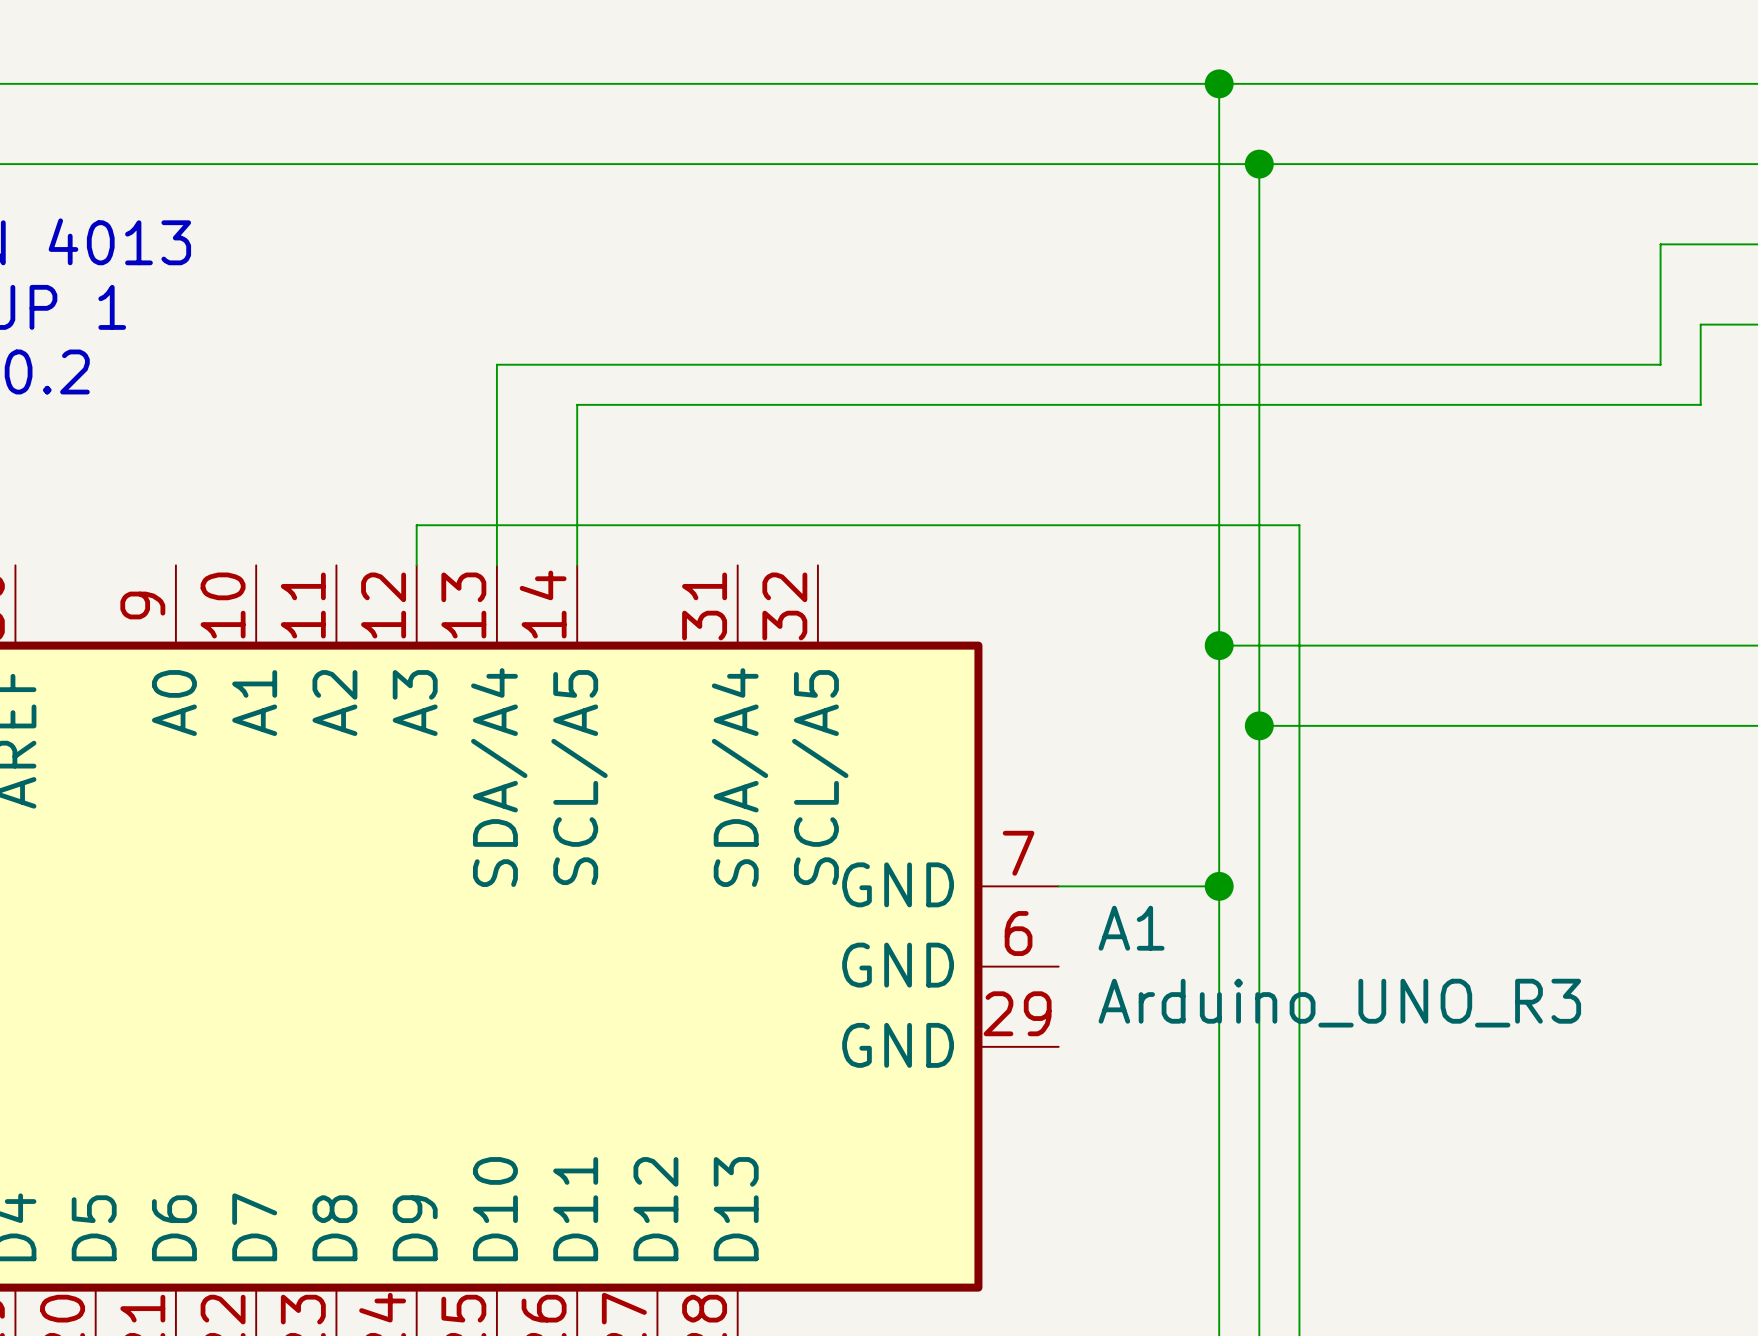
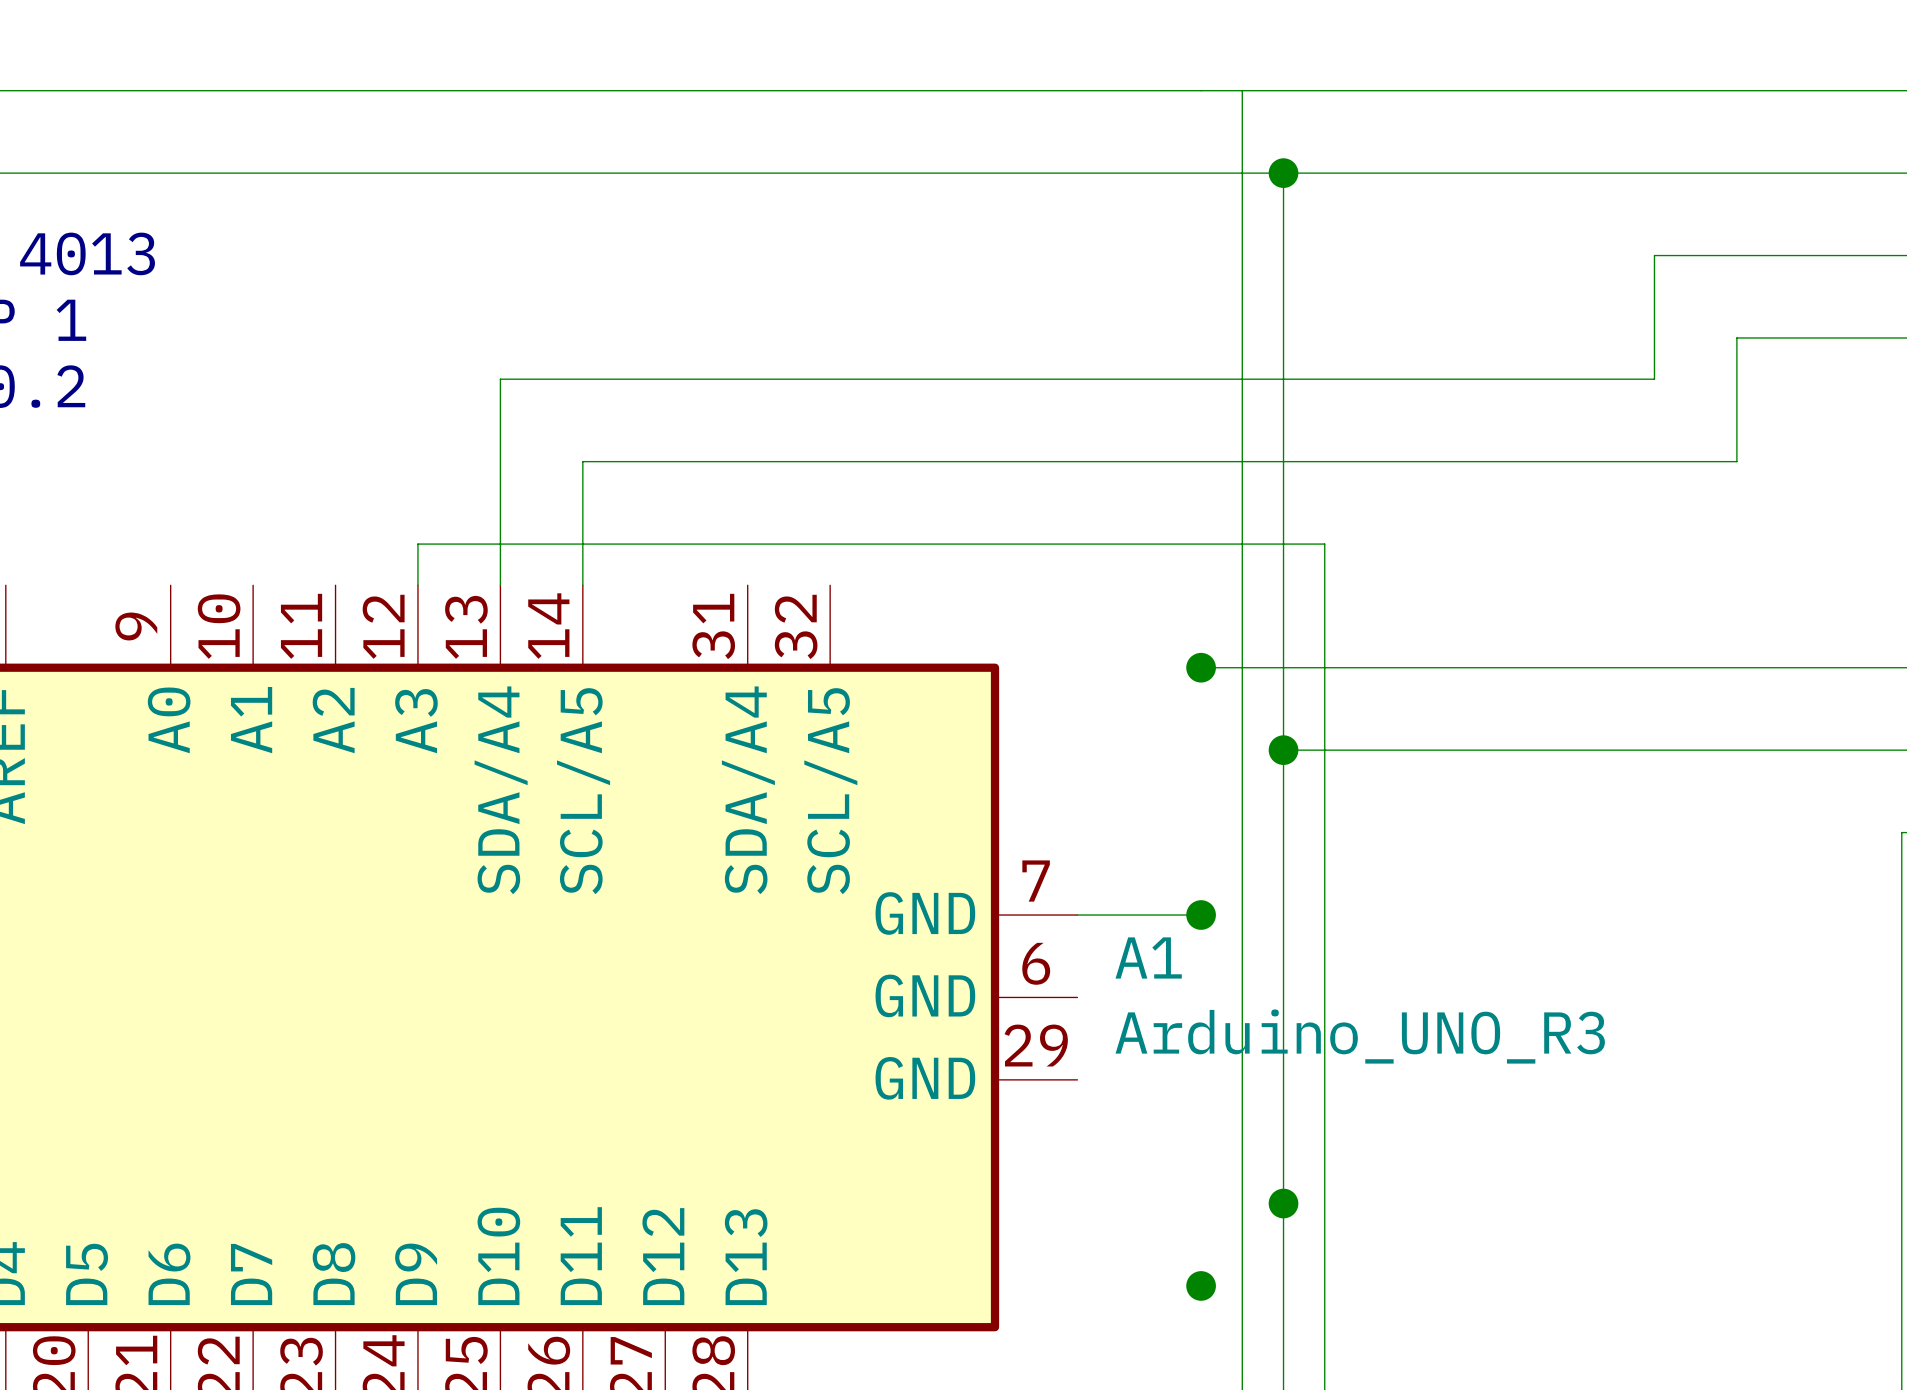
junction: (1219, 83) -> none
wire: (1660, 244) (1660, 364) (1620, 364) -> (1695, 255) (1654, 255) (1654, 379)
wire: (1700, 404) (577, 404) (577, 444) -> (1736, 420) (1736, 461) (582, 461)
junction position: (1219, 645) -> (1201, 667)
wire: (1179, 886) (1219, 886) -> (1201, 667) (1242, 667)
junction position: (1219, 886) -> (1201, 915)
junction: none -> (1283, 1203)
junction: none -> (1201, 1285)

